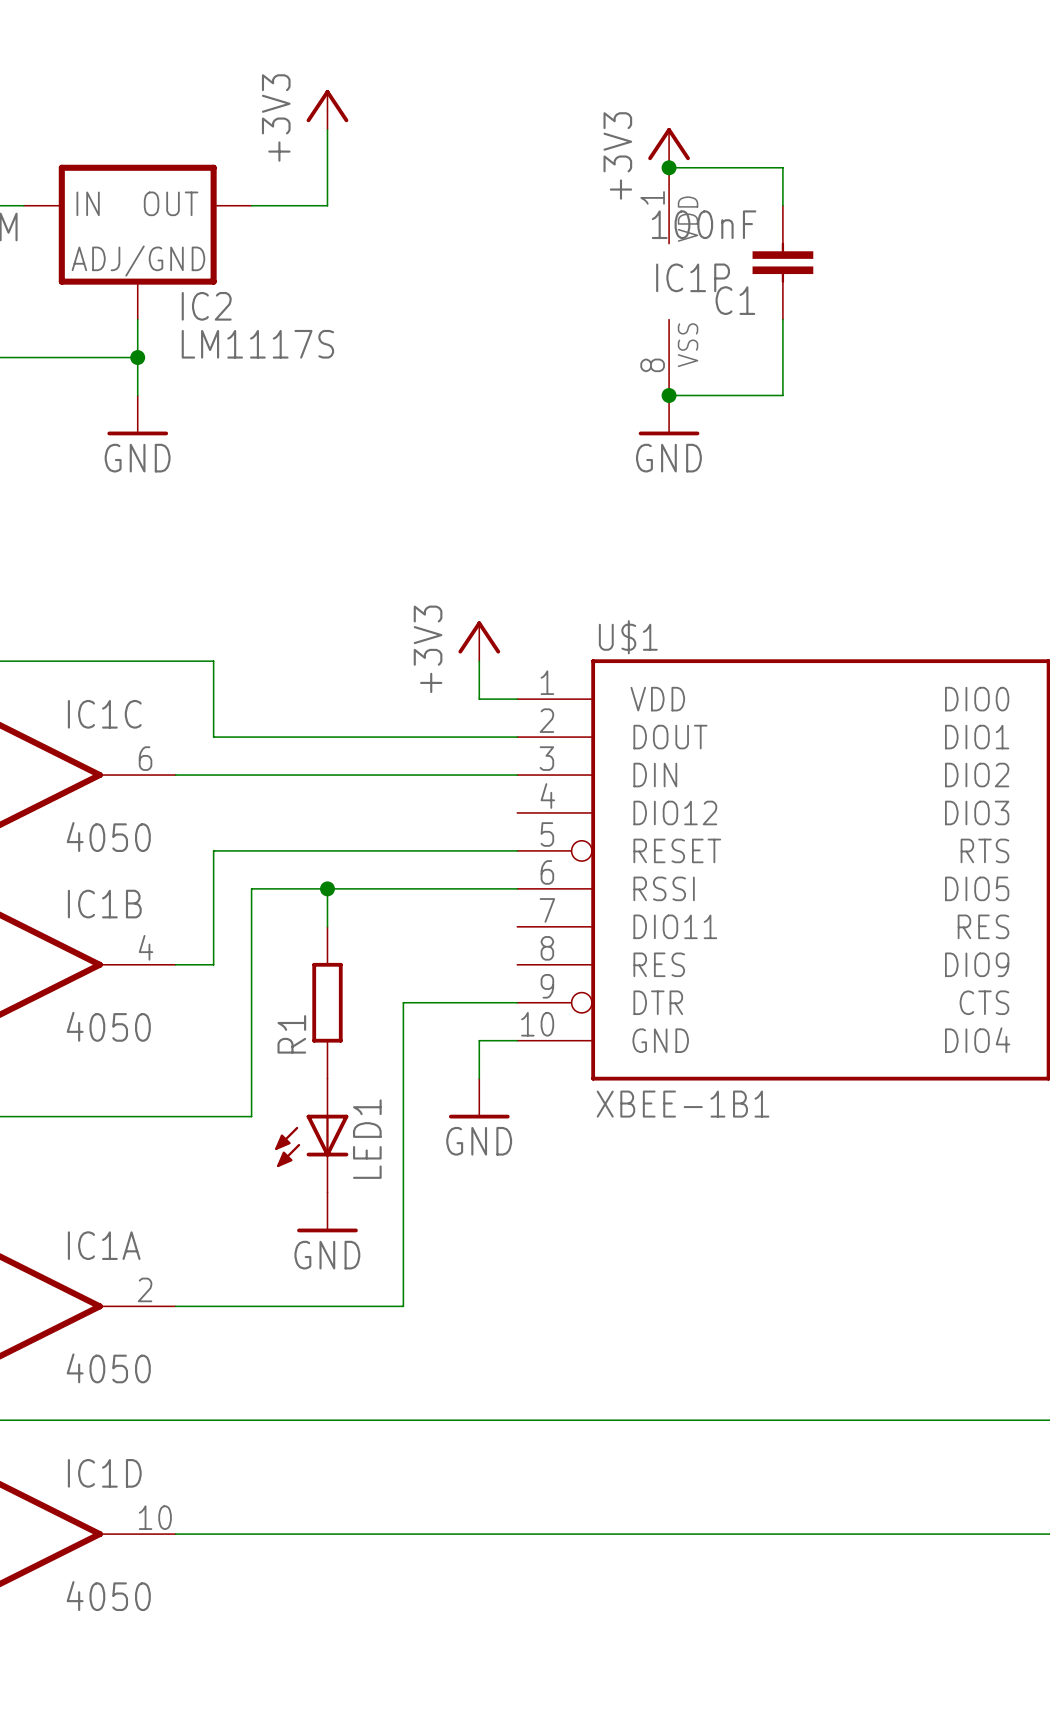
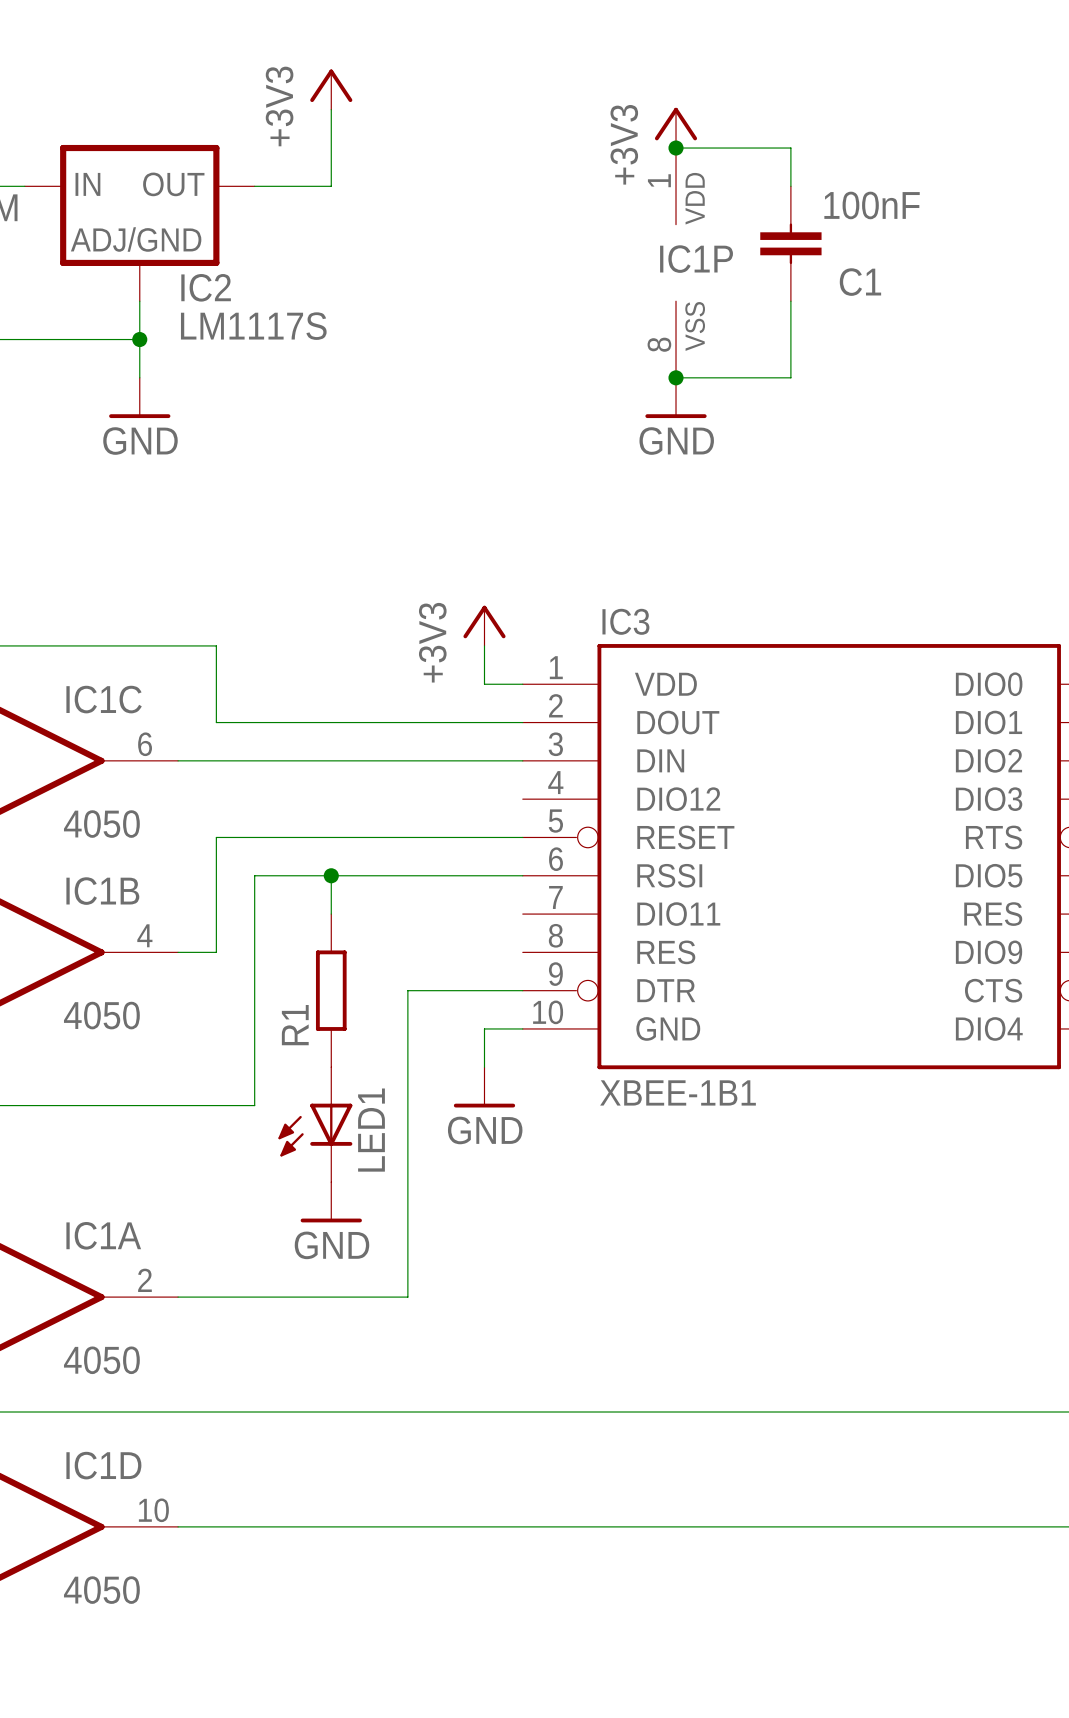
C1 value position: 100nF (704, 224) -> 100nF (872, 205)
C1 name position: C1 (735, 300) -> C1 (860, 282)
U$1 name: U$1 (628, 637) -> IC3 (625, 621)

